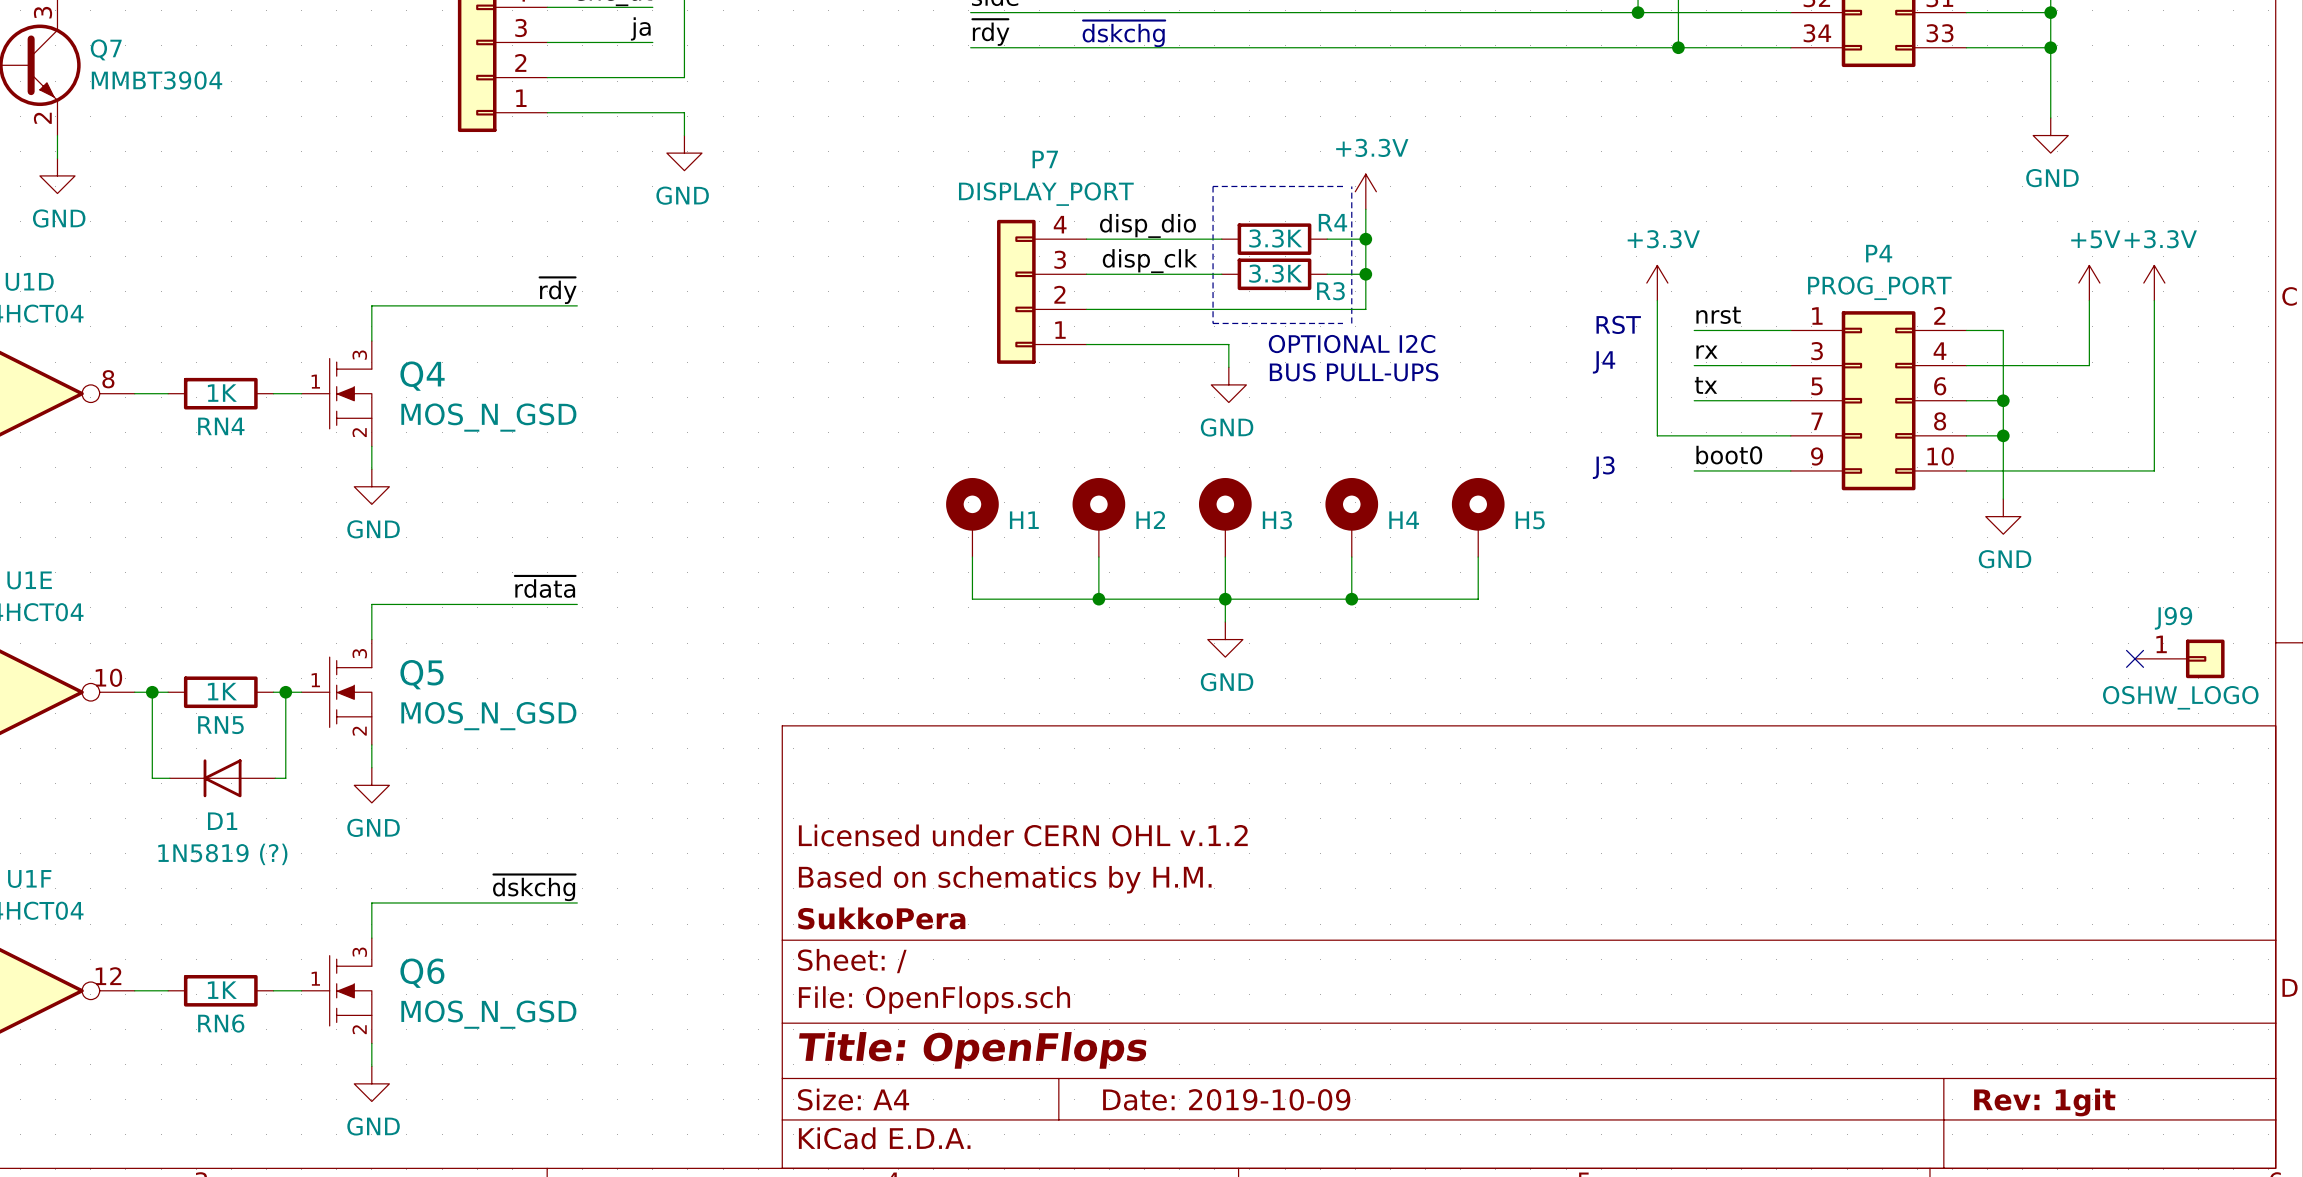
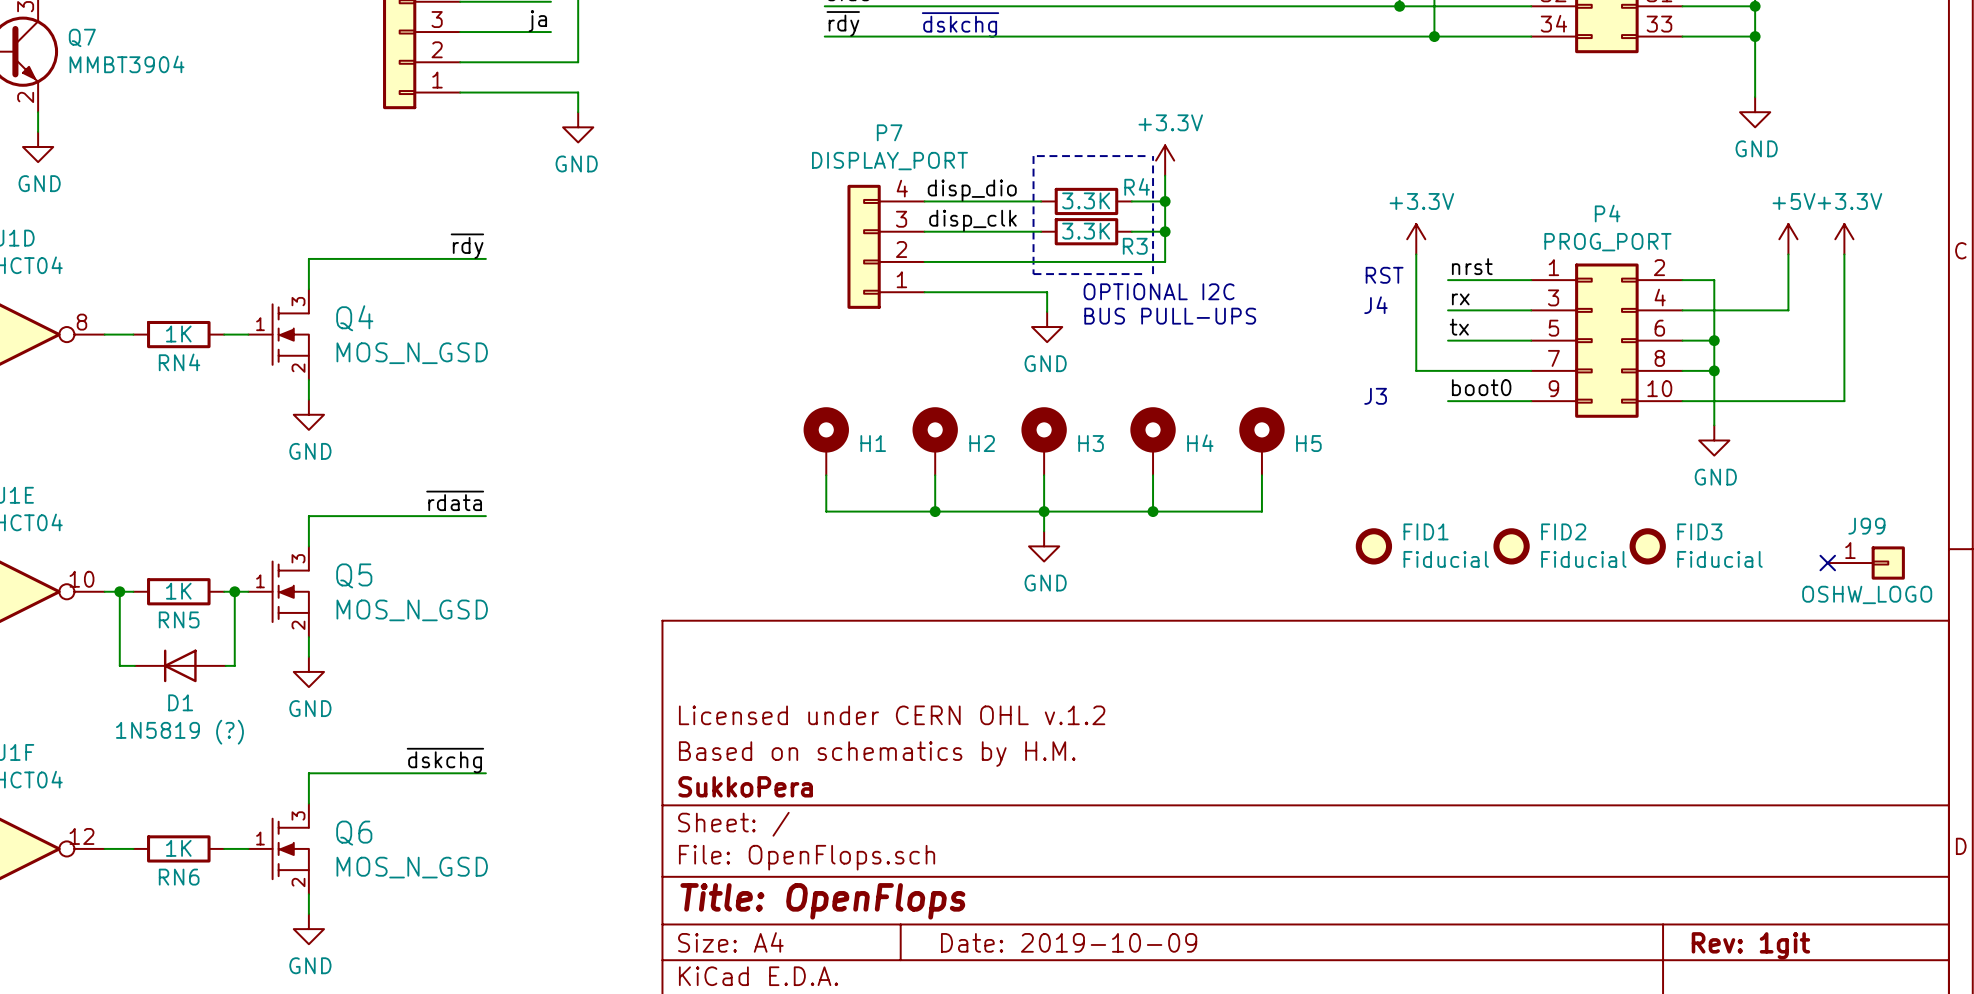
FID1: none -> Fiducial (1373, 546)
FID2: none -> Fiducial (1511, 546)
FID3: none -> Fiducial (1647, 546)

